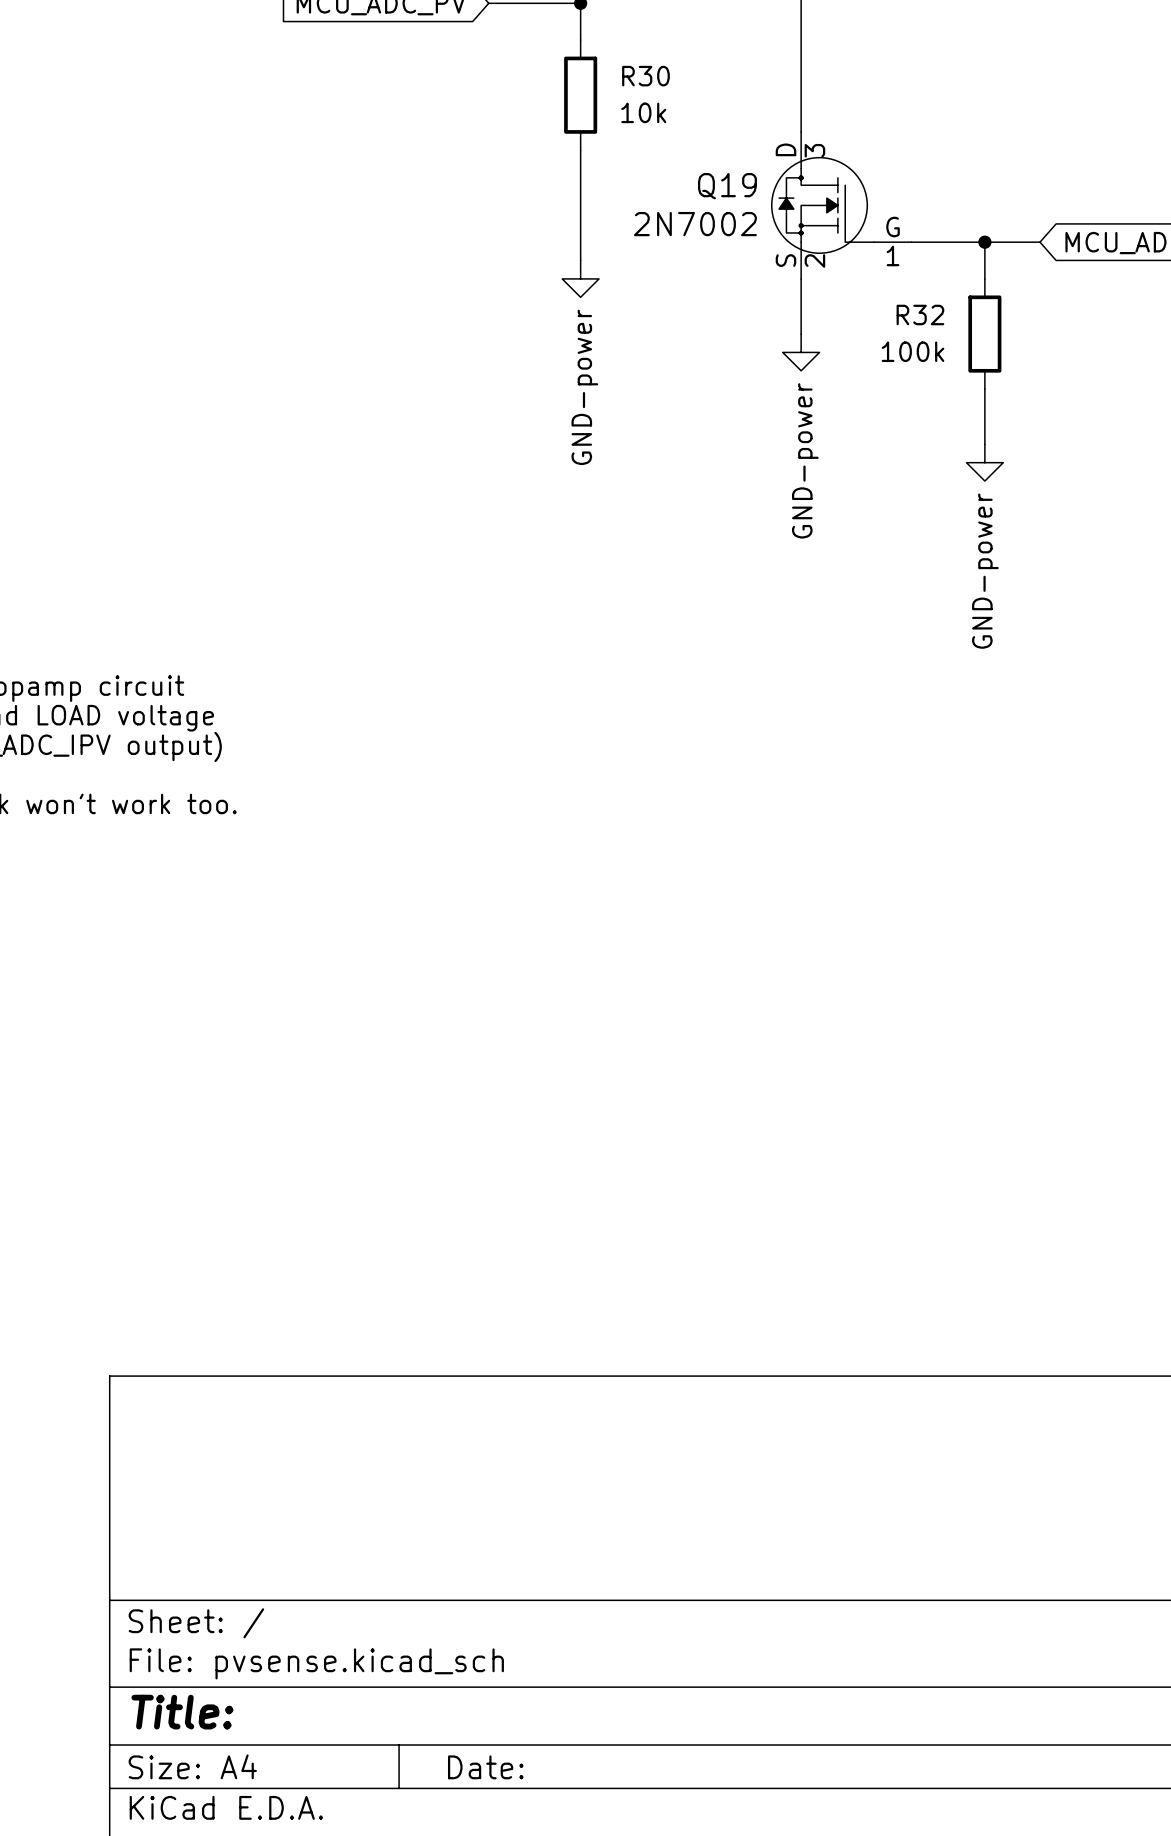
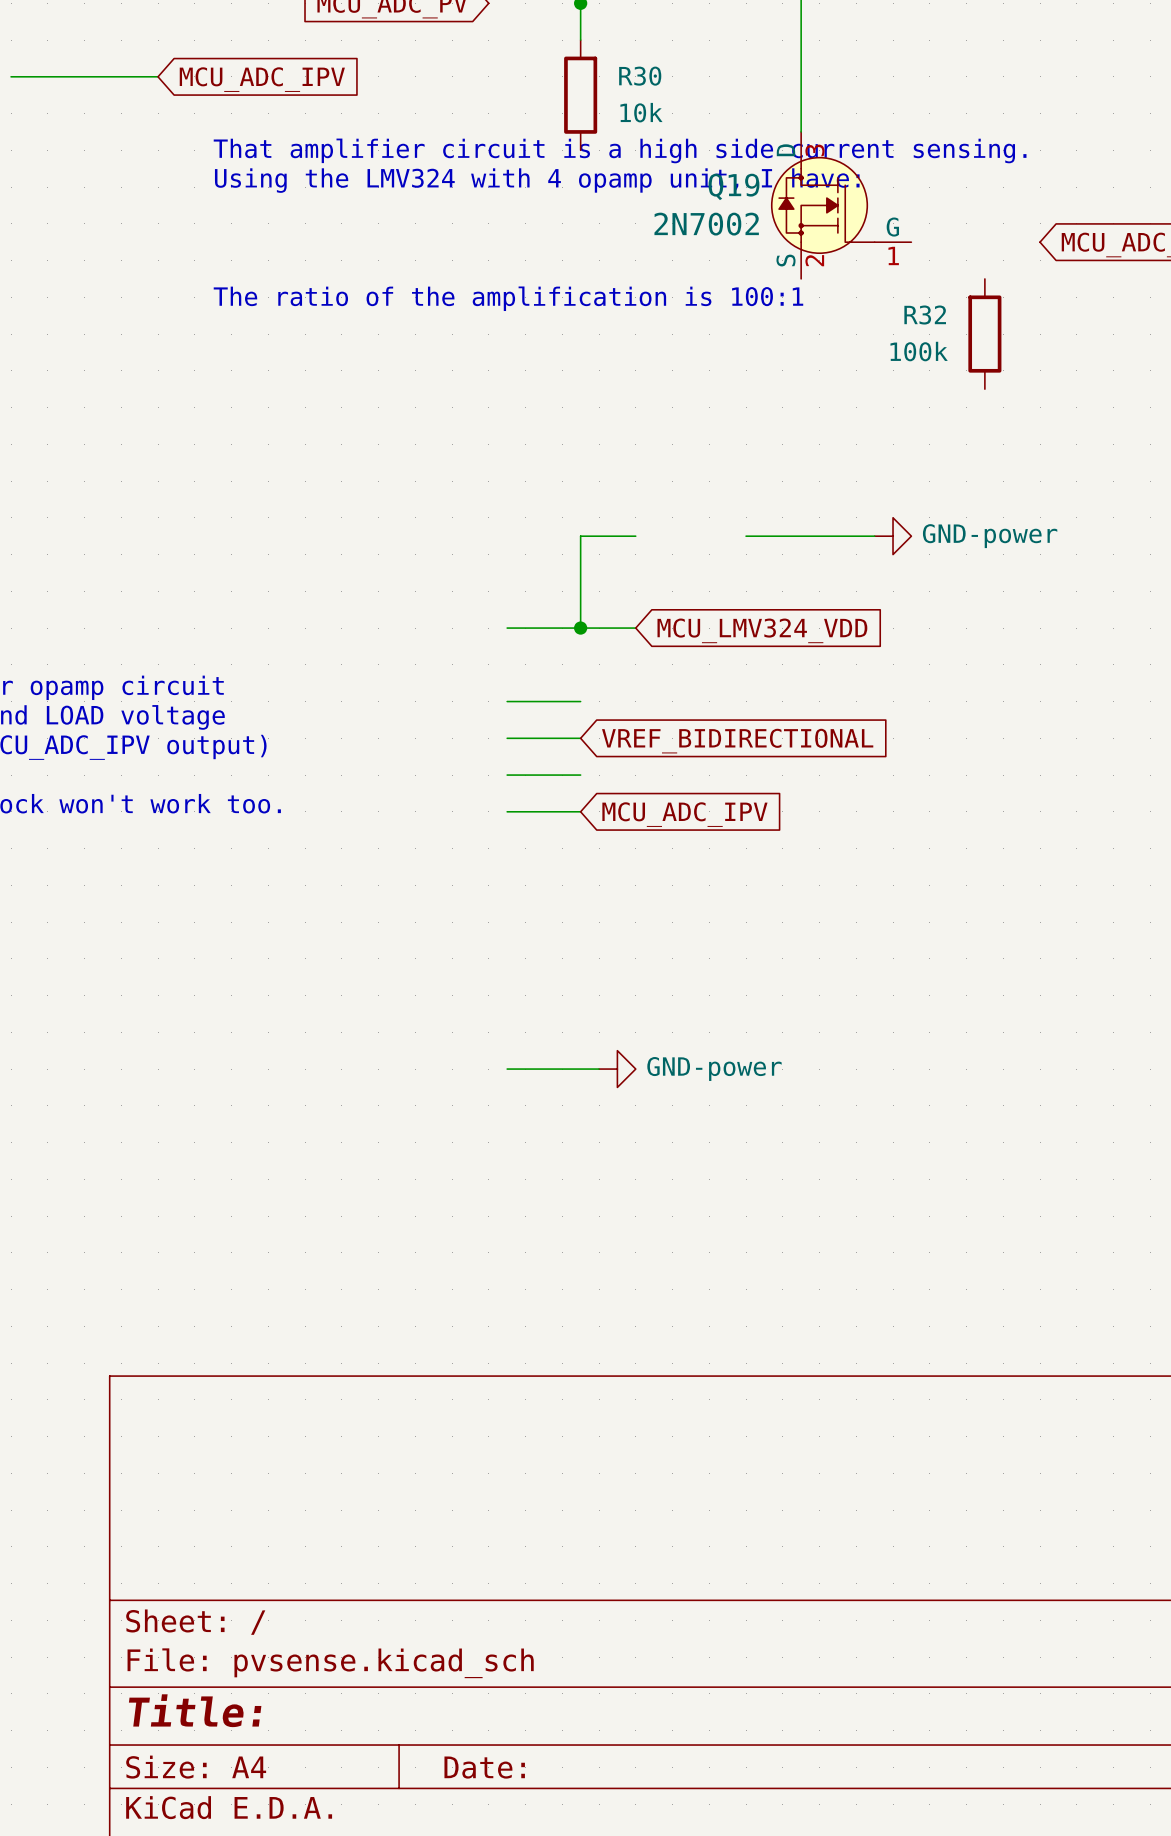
wire: (488, 3) (580, 3) -> none
wire: none -> (11, 76) (158, 76)
global label: none -> MCU_ADC_IPV (262, 79)
wire: (580, 150) (580, 260) -> none
text: none -> That amplifier circuit is a high side current sensing. (620, 150)
text: none -> Using the LMV324 with 4 opamp unit, I have: (537, 180)
wire: (911, 242) (1040, 242) -> (746, 536) (874, 536)
wire: (984, 242) (984, 278) -> none
junction: (984, 242) -> none
power symbol: GND-power (580, 278) -> none
wire: (801, 278) (801, 334) -> none
text: none -> The ratio of the amplification is 100:1 (508, 298)
power symbol: GND-power (801, 352) -> none
wire: (984, 389) (984, 444) -> none
power symbol: GND-power (984, 462) -> none
wire: none -> (635, 536) (580, 536) (580, 628)
power symbol: none -> GND-power (893, 536)
wire: none -> (507, 628) (635, 628)
junction: none -> (580, 628)
global label: none -> MCU_LMV324_VDD (762, 630)
wire: none -> (507, 701) (580, 701)
wire: none -> (507, 738) (580, 738)
global label: none -> VREF_BIDIRECTIONAL (737, 741)
wire: none -> (507, 775) (580, 775)
wire: none -> (507, 811) (580, 811)
global label: none -> MCU_ADC_IPV (684, 814)
wire: none -> (507, 1069) (599, 1069)
power symbol: none -> GND-power (617, 1069)

